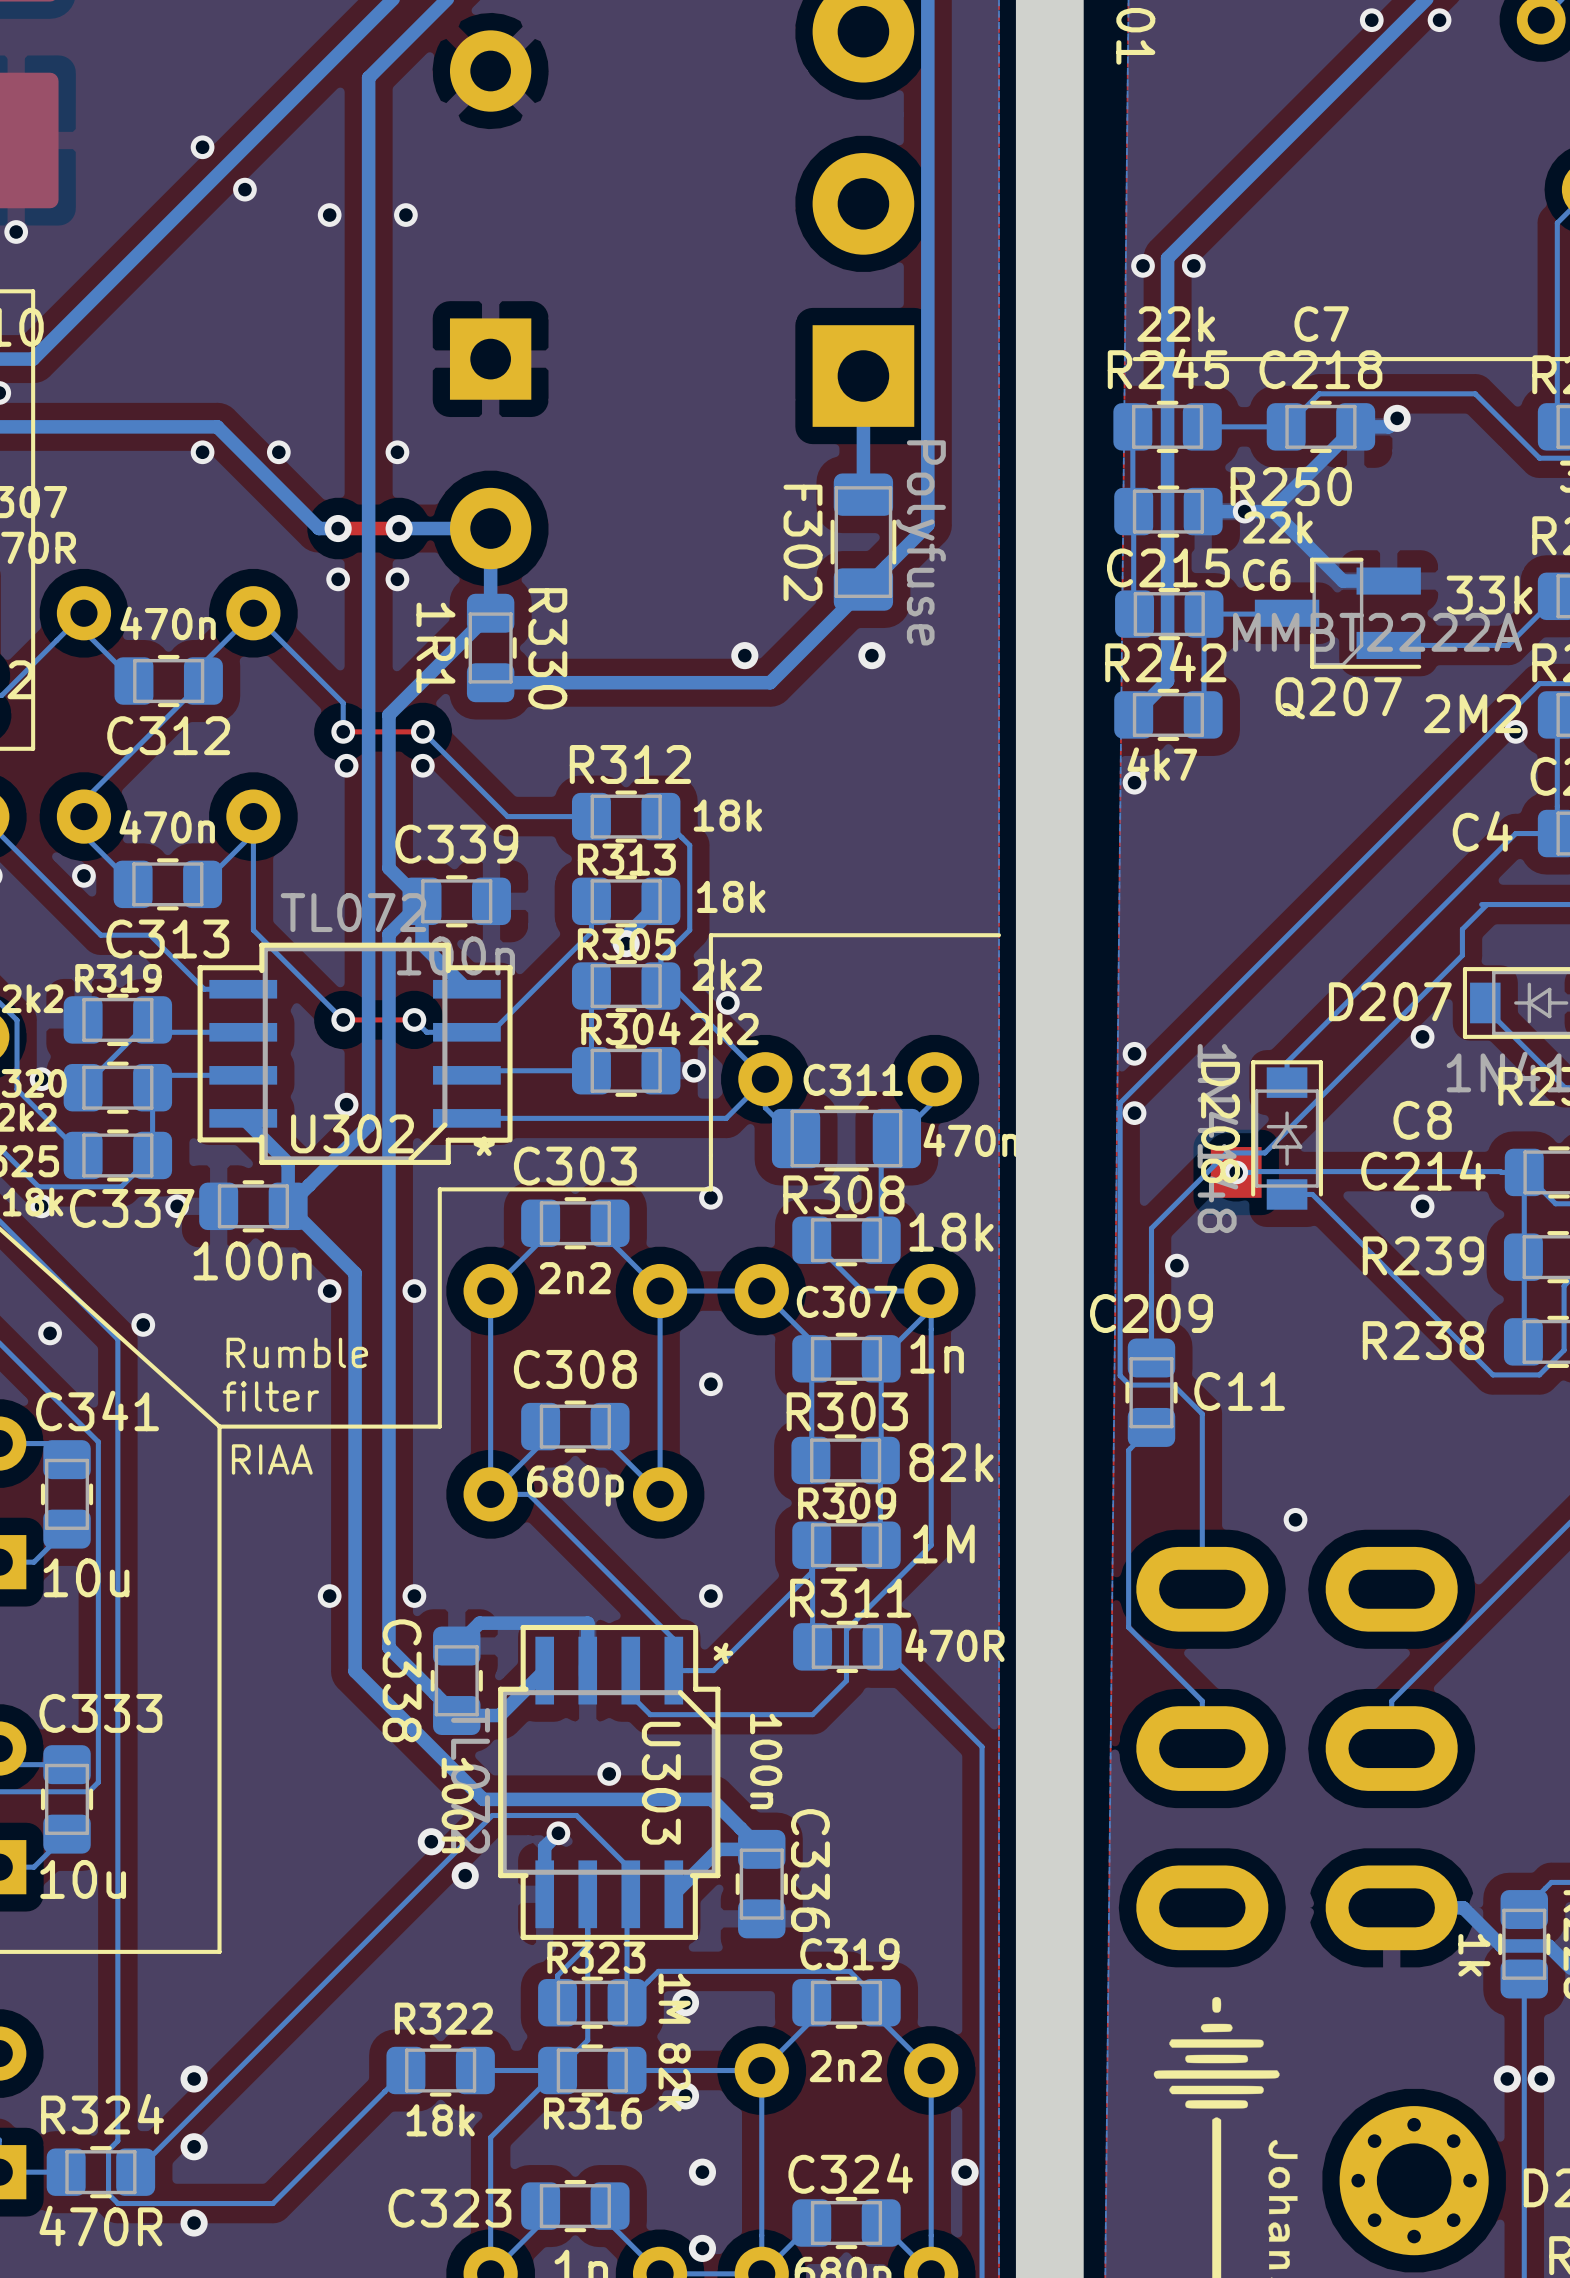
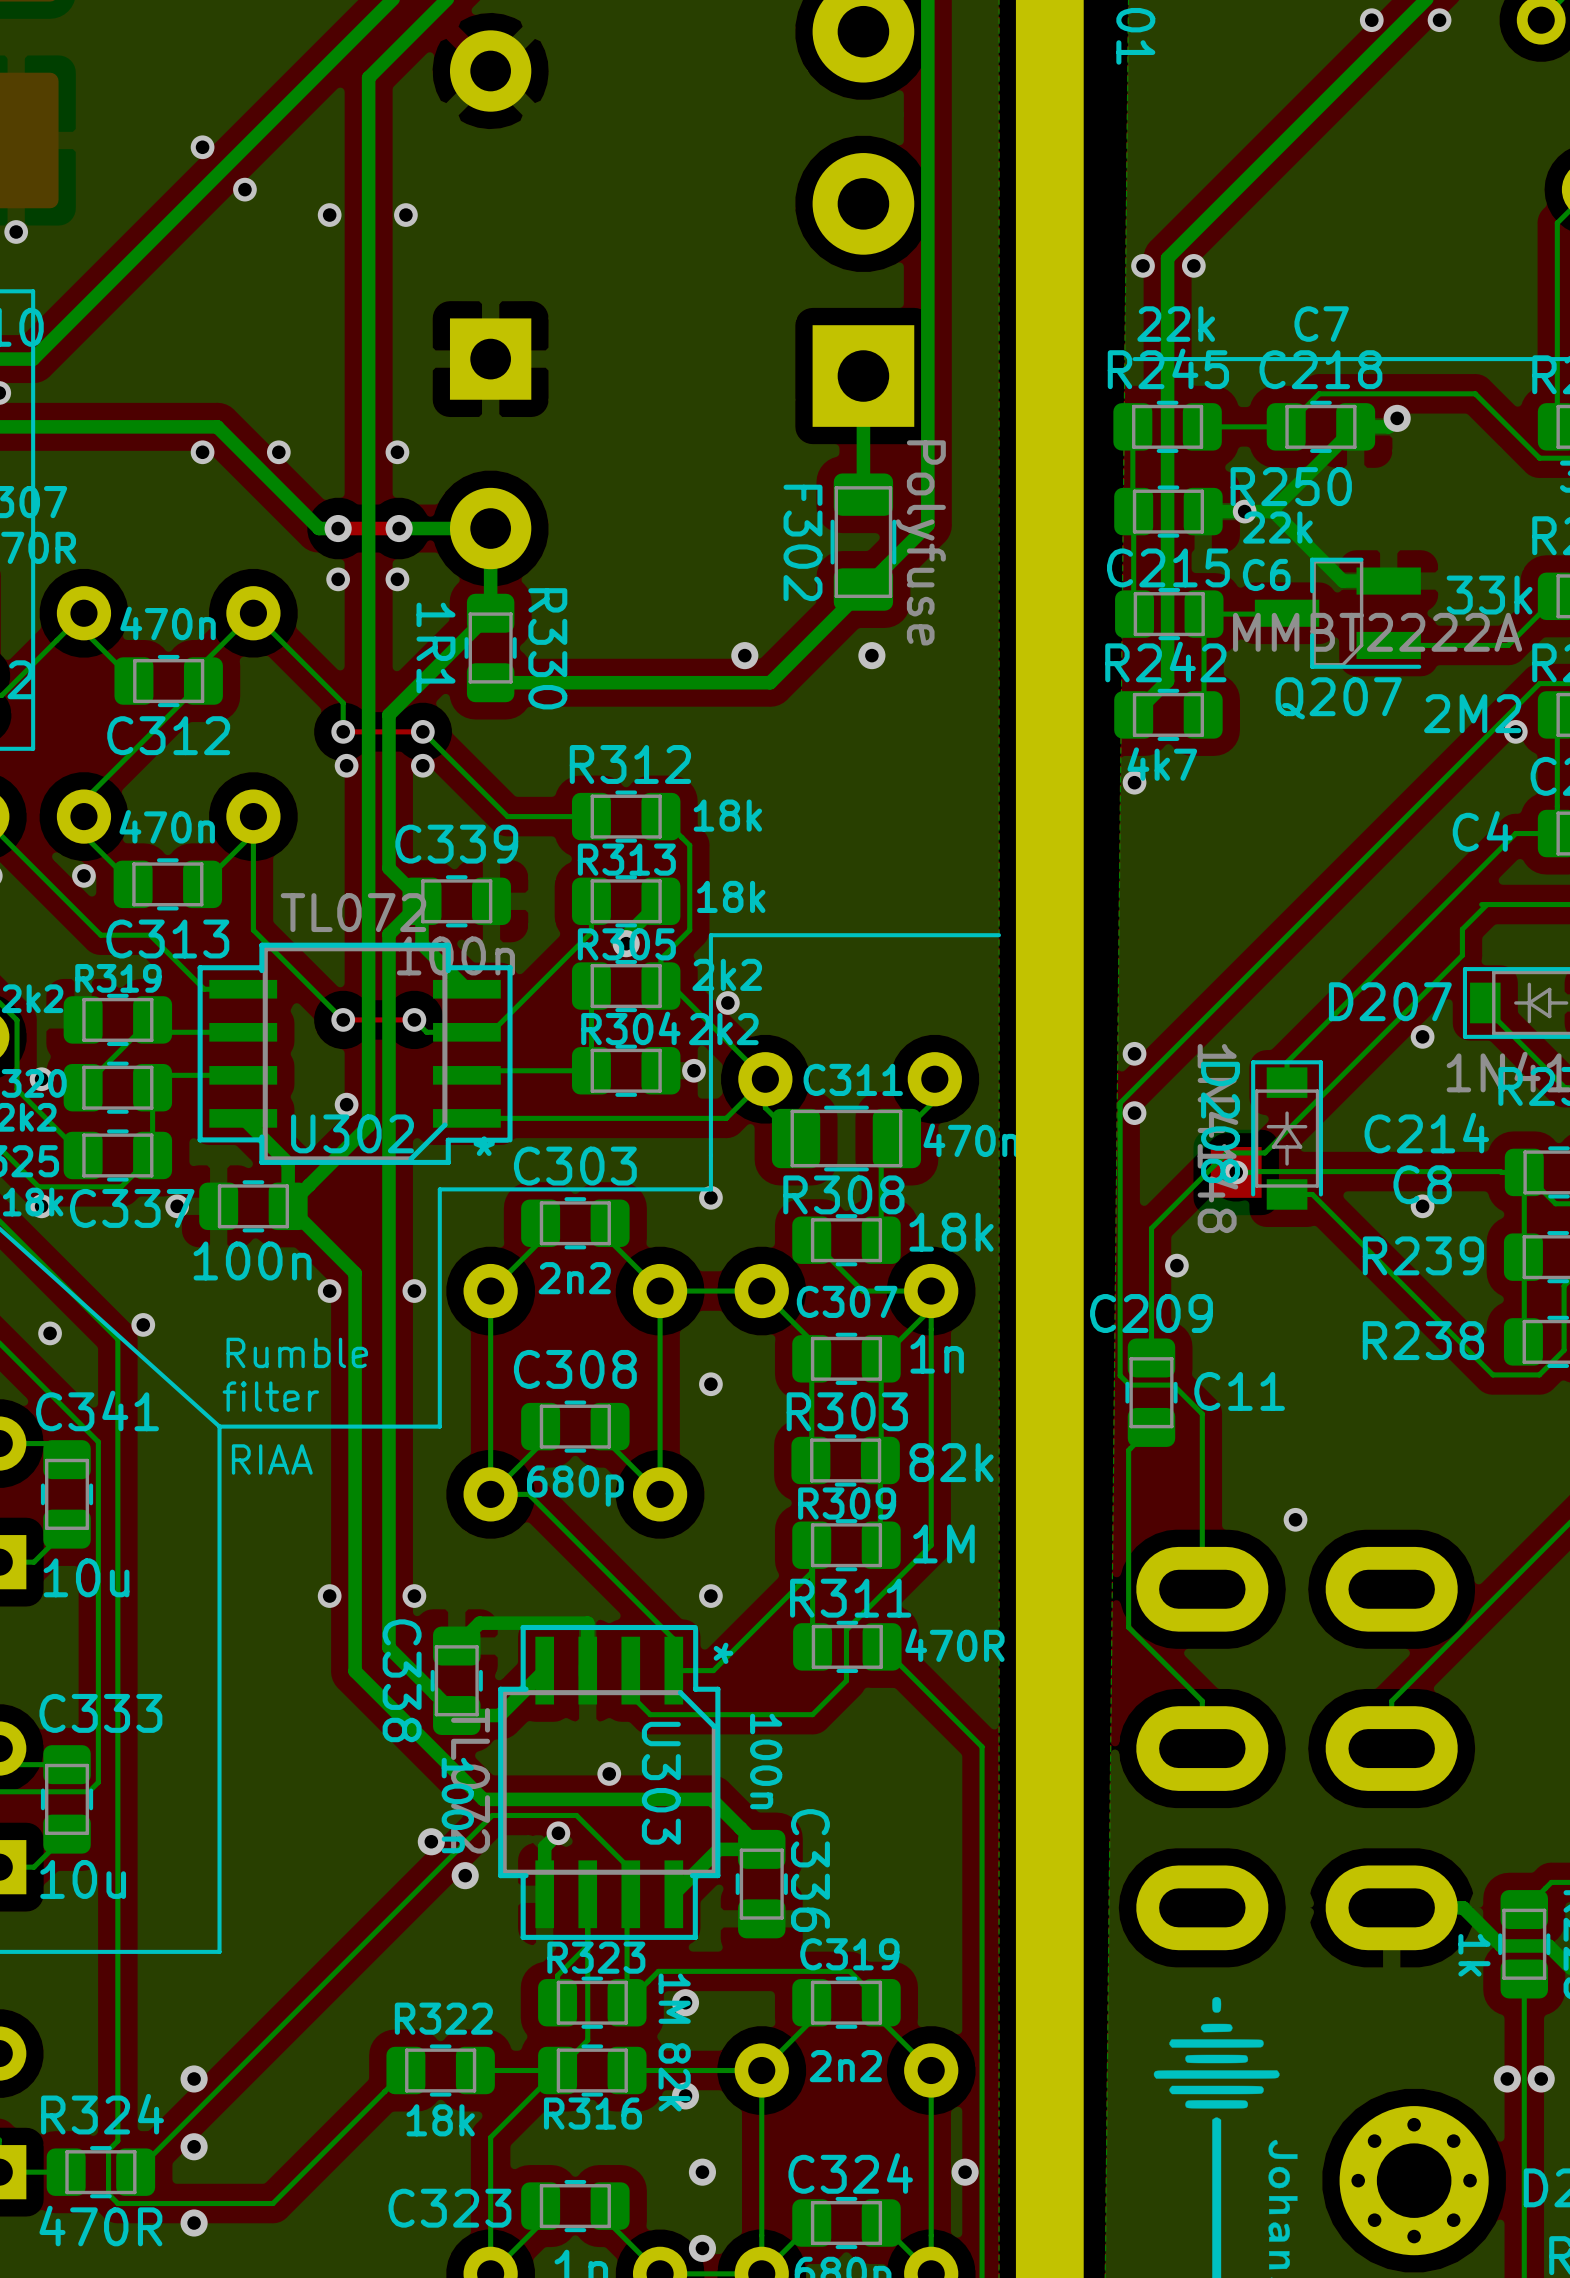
C214 value position: C8 (1422, 1120) -> C8 (1422, 1184)
C214 name position: C214 (1423, 1170) -> C214 (1426, 1133)

